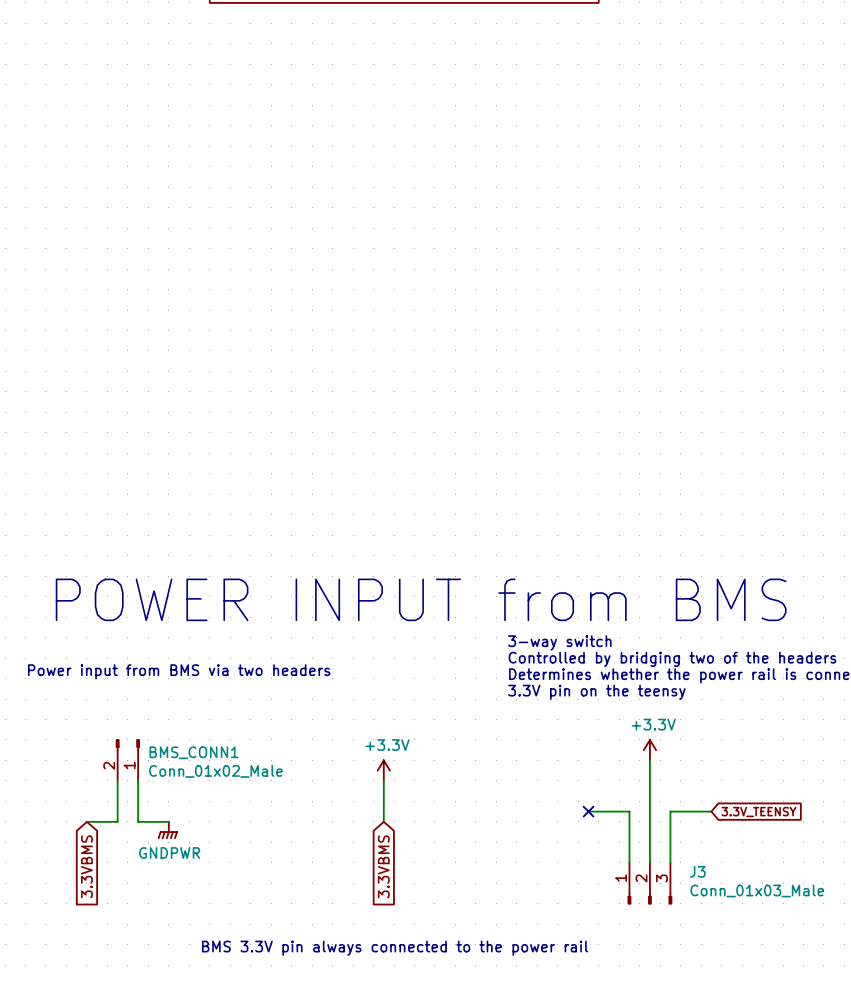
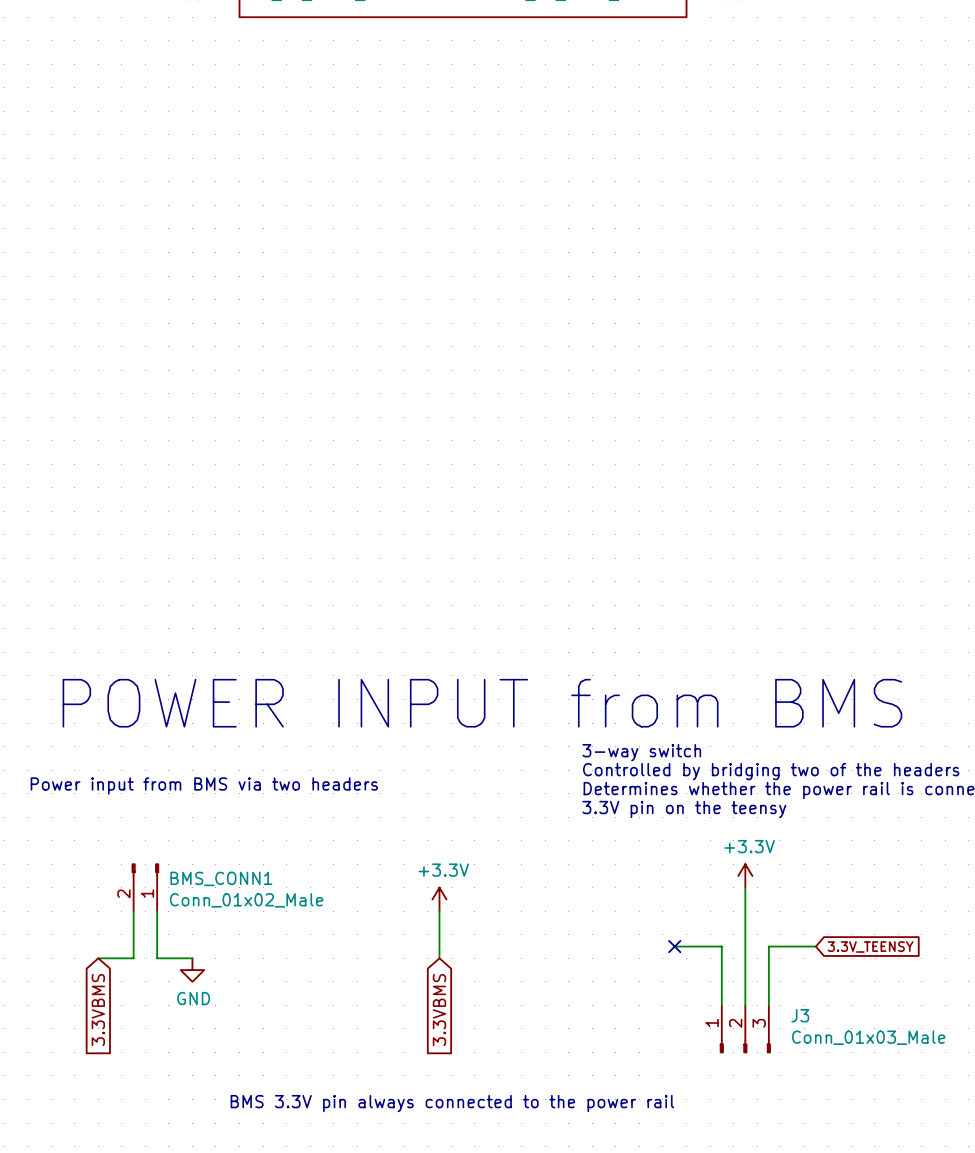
power symbol: GNDPWR (167, 830) -> GND (192, 970)

